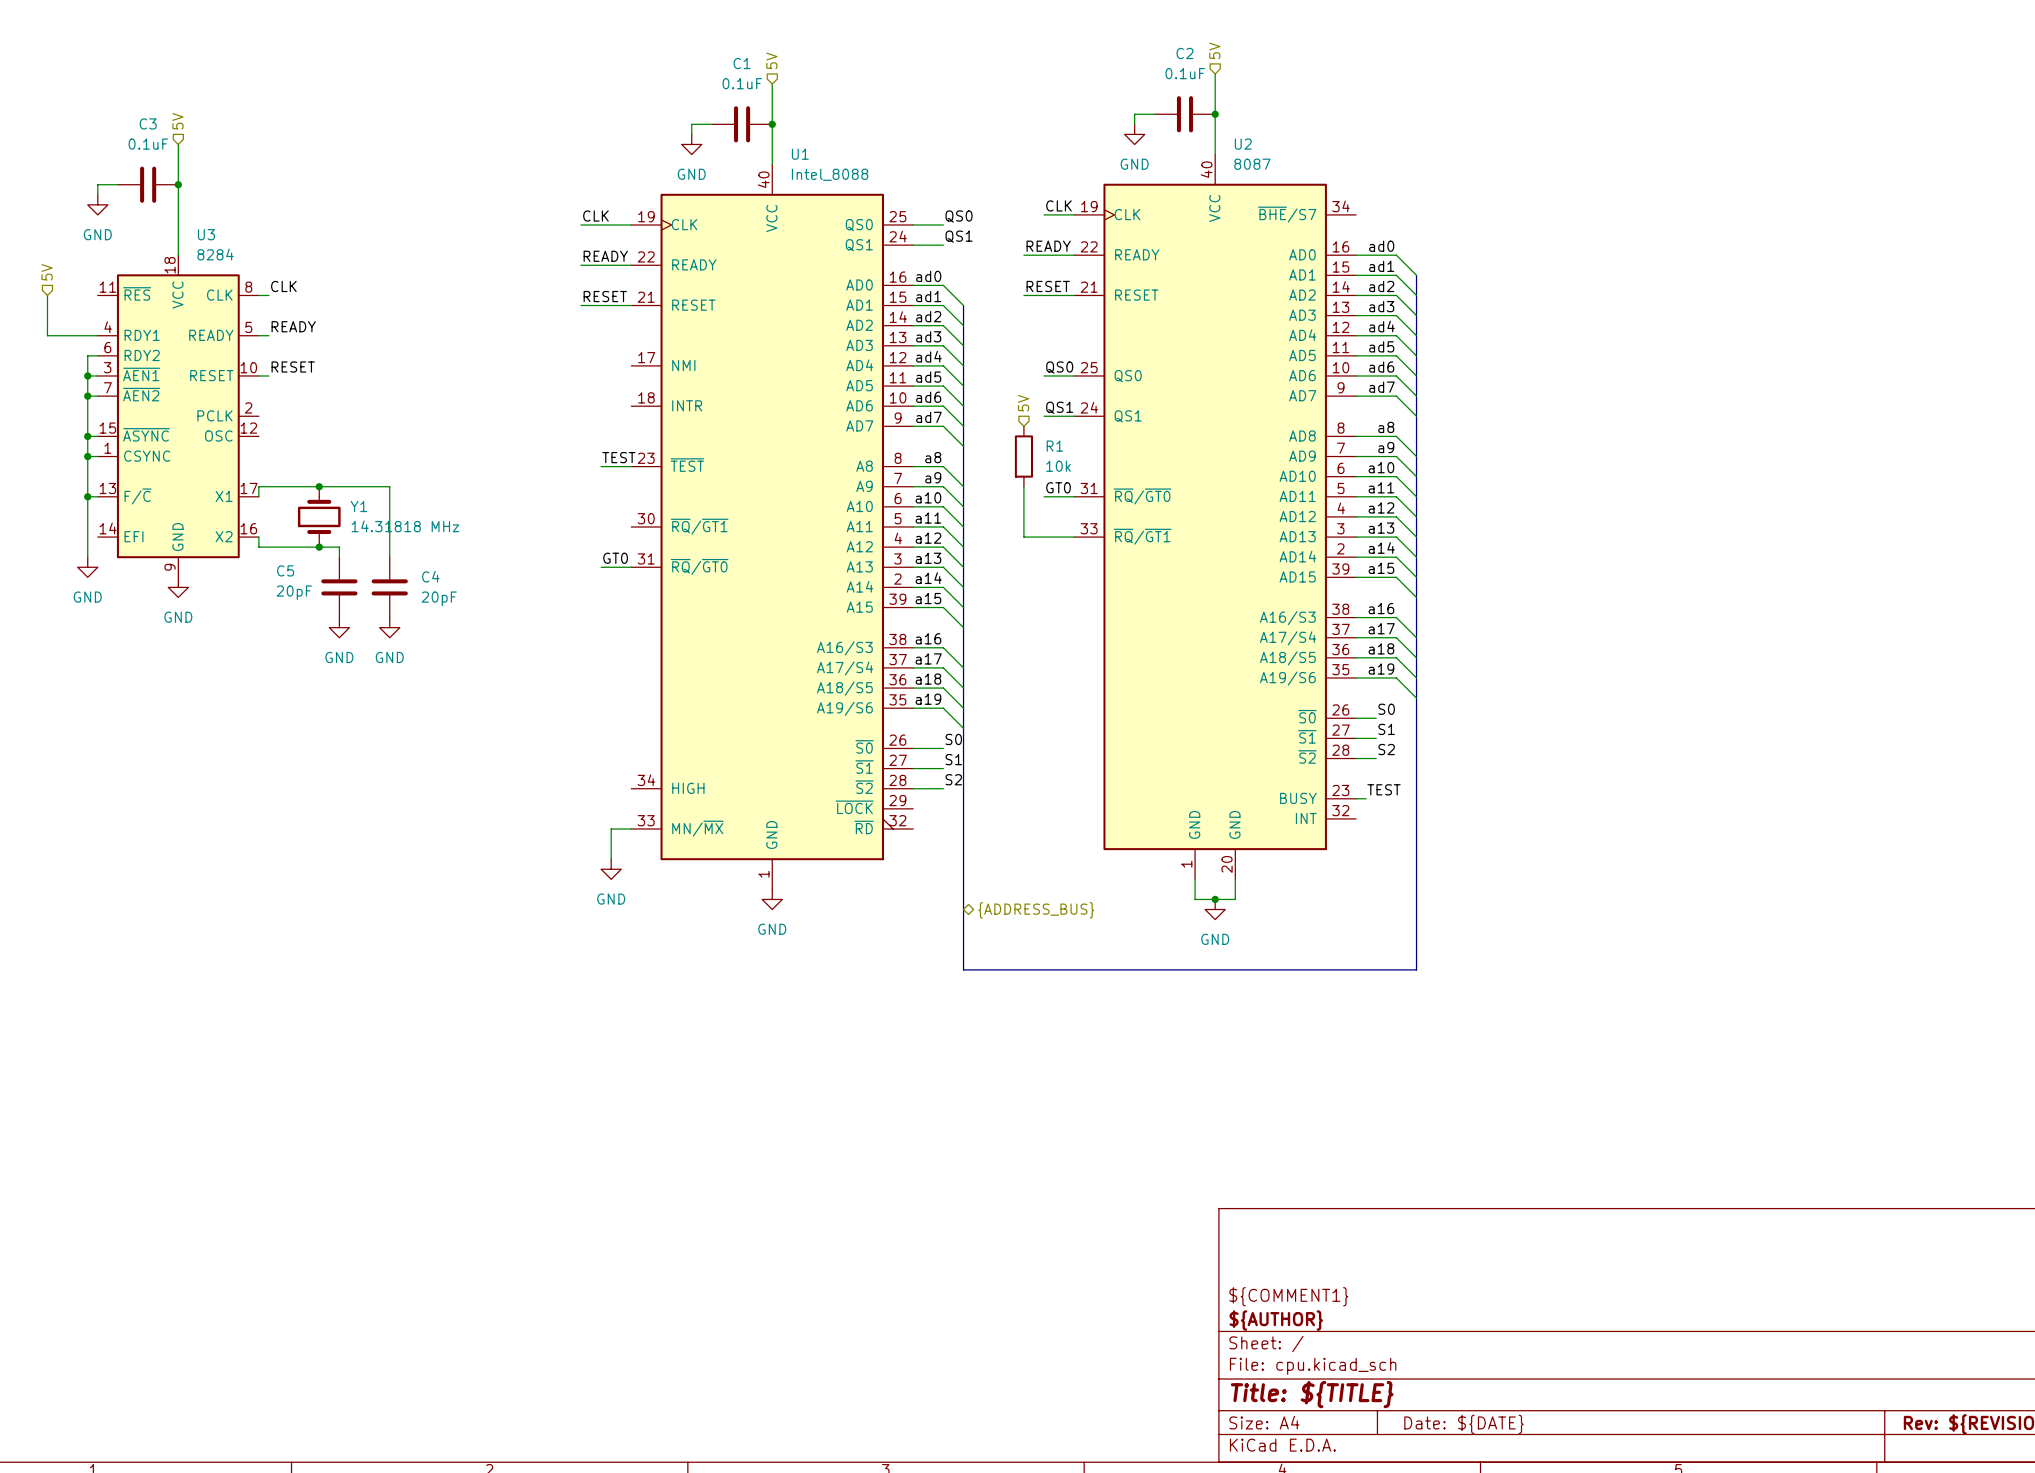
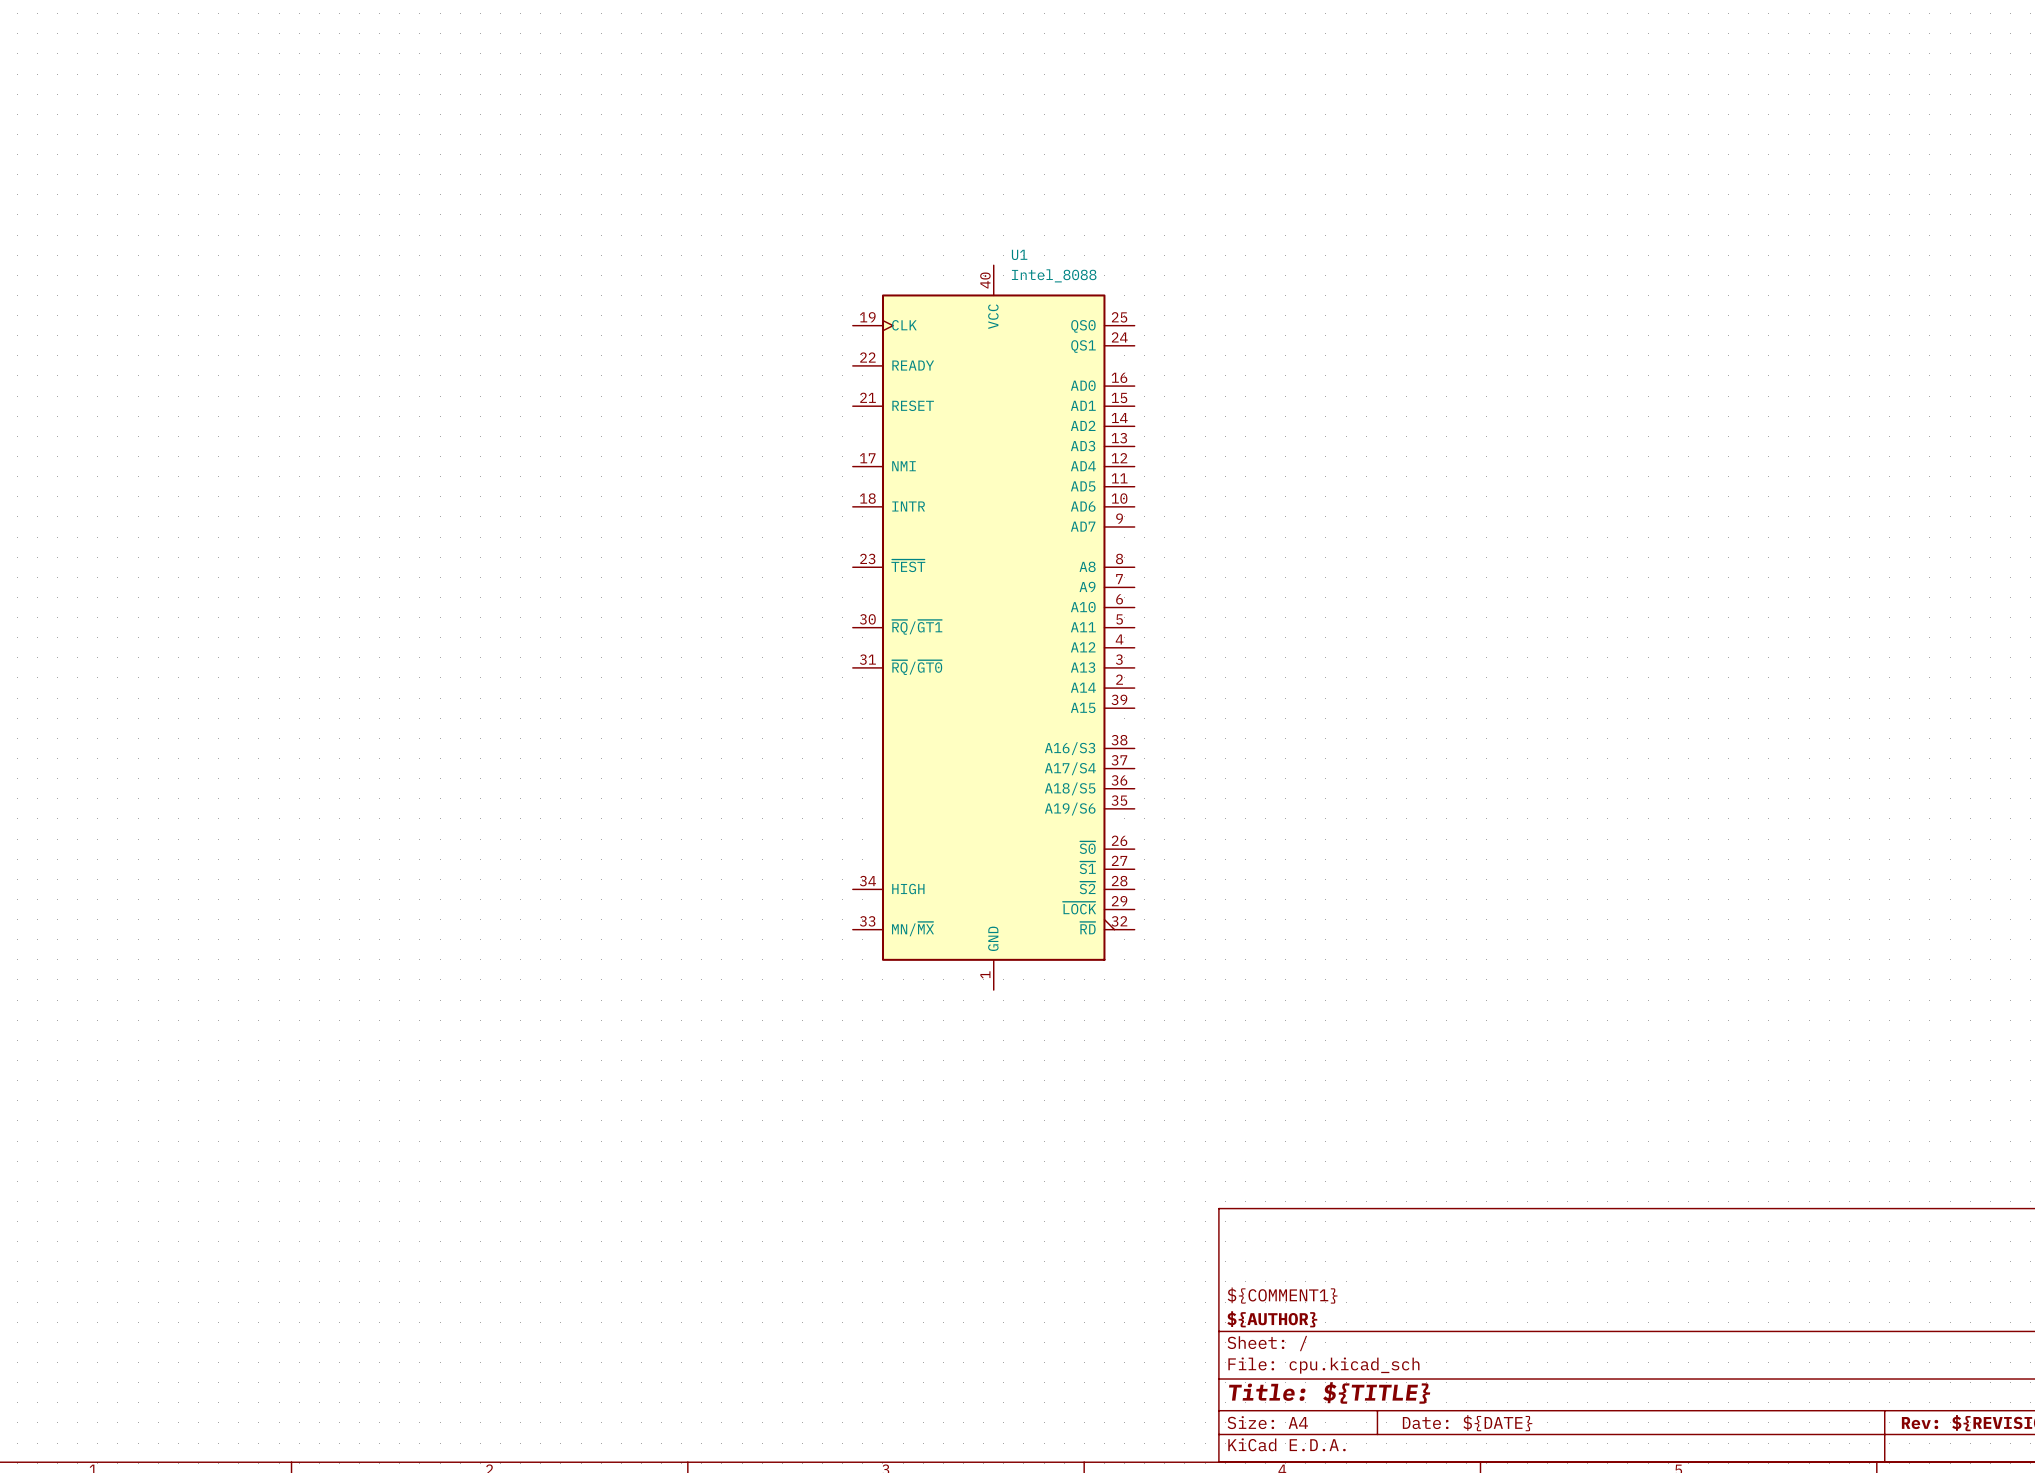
hierarchical label: 5V (1214, 50) -> none
hierarchical label: 5V (771, 60) -> none
wire: (1215, 74) (1215, 154) -> none
wire: (772, 84) (772, 164) -> none
wire: (1154, 114) (1134, 114) (1134, 124) -> none
C2: 0.1uF (1184, 114) -> none
junction: (1215, 114) -> none
hierarchical label: 5V (177, 121) -> none
wire: (711, 124) (691, 124) (691, 134) -> none
C1: 0.1uF (742, 124) -> none
junction: (772, 124) -> none
power symbol: GND (1134, 134) -> none
wire: (178, 144) (178, 255) -> none
power symbol: GND (691, 144) -> none
wire: (117, 184) (97, 184) (97, 194) -> none
C3: 0.1uF (148, 184) -> none
junction: (178, 184) -> none
power symbol: GND (97, 204) -> none
label: CLK (1059, 205) -> none
wire: (1044, 214) (1074, 214) -> none
label: CLK (595, 216) -> none
label: QS0 (959, 216) -> none
wire: (581, 224) (631, 224) -> none
wire: (913, 224) (943, 224) -> none
label: QS1 (959, 236) -> none
wire: (913, 245) (943, 245) -> none
label: READY (1048, 246) -> none
label: ad0 (1381, 246) -> none
wire: (1023, 255) (1074, 255) -> none
wire: (1356, 255) (1396, 255) (1416, 275) -> none
label: READY (605, 256) -> none
wire: (581, 265) (631, 265) -> none
label: ad1 (1381, 266) -> none
hierarchical label: 5V (47, 272) -> none
wire: (1356, 275) (1396, 275) (1416, 295) -> none
bus: (1416, 275) (1416, 969) (963, 969) (963, 305) -> none
label: ad0 (928, 276) -> none
wire: (913, 285) (943, 285) (963, 305) -> none
label: CLK (283, 286) -> none
label: RESET (1048, 286) -> none
label: ad2 (1381, 286) -> none
wire: (47, 295) (47, 335) (97, 335) -> none
wire: (258, 295) (268, 295) -> none
wire: (1356, 295) (1396, 295) (1416, 315) -> none
label: RESET (605, 296) -> none
label: ad1 (928, 296) -> none
wire: (581, 305) (631, 305) -> none
label: ad3 (1381, 306) -> none
wire: (1356, 315) (1396, 315) (1416, 335) -> none
label: ad2 (928, 316) -> none
label: READY (293, 326) -> none
label: ad4 (1381, 326) -> none
wire: (258, 335) (268, 335) -> none
wire: (1356, 335) (1396, 335) (1416, 355) -> none
label: ad3 (928, 336) -> none
label: ad5 (1381, 346) -> none
wire: (97, 355) (87, 355) (87, 557) -> none
wire: (1356, 355) (1396, 355) (1416, 375) -> none
label: ad4 (928, 356) -> none
label: RESET (293, 367) -> none
label: QS0 (1059, 367) -> none
label: ad6 (1381, 367) -> none
wire: (87, 375) (97, 375) -> none
junction: (87, 375) -> none
wire: (258, 375) (268, 375) -> none
wire: (1356, 375) (1396, 375) (1416, 396) -> none
label: ad5 (928, 377) -> none
label: ad7 (1381, 387) -> none
wire: (87, 396) (97, 396) -> none
junction: (87, 396) -> none
wire: (1356, 396) (1396, 396) (1416, 416) -> none
label: ad6 (928, 397) -> none
hierarchical label: 5V (1023, 403) -> none
label: QS1 (1059, 407) -> none
U3: 8284 (178, 416) -> none
label: ad7 (928, 417) -> none
label: a8 (1386, 427) -> none
wire: (87, 436) (97, 436) -> none
junction: (87, 436) -> none
wire: (1356, 436) (1396, 436) (1416, 456) -> none
label: a9 (1386, 447) -> none
wire: (87, 456) (97, 456) -> none
junction: (87, 456) -> none
R1: 10k (1023, 456) -> none
wire: (1356, 456) (1396, 456) (1416, 476) -> none
label: TEST (618, 457) -> none
label: a8 (933, 457) -> none
wire: (601, 466) (631, 466) -> none
label: a10 (1381, 467) -> none
wire: (1356, 476) (1396, 476) (1416, 496) -> none
label: a9 (933, 477) -> none
junction: (319, 486) -> none
label: GT0 (1058, 487) -> none
label: a11 (1381, 487) -> none
wire: (87, 496) (97, 496) -> none
junction: (87, 496) -> none
wire: (258, 496) (258, 486) (389, 486) (389, 557) -> none
wire: (1356, 496) (1396, 496) (1416, 516) -> none
label: a10 (928, 497) -> none
label: a12 (1381, 507) -> none
Y1: 14.31818 MHz (319, 516) -> none
U2: 8087 (1215, 516) -> none
wire: (1356, 516) (1396, 516) (1416, 537) -> none
label: a11 (928, 518) -> none
U1 position: (772, 526) -> (993, 627)
label: a13 (1381, 528) -> none
wire: (258, 537) (258, 547) (339, 547) (339, 557) -> none
wire: (1356, 537) (1396, 537) (1416, 557) -> none
label: a12 (928, 538) -> none
junction: (319, 547) -> none
label: a14 (1381, 547) -> none
wire: (1356, 557) (1396, 557) (1416, 577) -> none
label: GT0 (615, 558) -> none
label: a13 (928, 558) -> none
power symbol: GND (87, 567) -> none
wire: (601, 567) (631, 567) -> none
label: a15 (1381, 568) -> none
wire: (1356, 577) (1396, 577) (1416, 597) -> none
label: a14 (928, 578) -> none
power symbol: GND (178, 587) -> none
C5: 20pF (339, 587) -> none
C4: 20pF (389, 587) -> none
label: a15 (928, 598) -> none
label: a16 (1381, 608) -> none
wire: (1356, 617) (1396, 617) (1416, 637) -> none
power symbol: GND (339, 627) -> none
power symbol: GND (389, 627) -> none
label: a17 (1381, 628) -> none
wire: (1356, 637) (1396, 637) (1416, 657) -> none
label: a16 (928, 638) -> none
label: a18 (1381, 648) -> none
wire: (1356, 657) (1396, 657) (1416, 677) -> none
label: a17 (928, 658) -> none
label: a19 (1381, 669) -> none
wire: (1356, 677) (1396, 677) (1416, 698) -> none
label: a18 (928, 679) -> none
label: a19 (928, 699) -> none
label: S0 (1386, 709) -> none
wire: (1356, 718) (1376, 718) -> none
label: S1 (1386, 729) -> none
wire: (1356, 738) (1376, 738) -> none
label: S0 (953, 739) -> none
label: S2 (1386, 749) -> none
wire: (1356, 758) (1376, 758) -> none
label: S1 (953, 759) -> none
label: S2 (953, 779) -> none
label: TEST (1384, 789) -> none
wire: (1356, 798) (1366, 798) -> none
wire: (631, 828) (611, 828) (611, 859) -> none
power symbol: GND (611, 869) -> none
wire: (1195, 879) (1195, 899) (1235, 899) (1235, 879) -> none
power symbol: GND (772, 899) -> none
junction: (1215, 899) -> none
power symbol: GND (1215, 909) -> none
hierarchical label: {ADDRESS_BUS} (1036, 910) -> none

